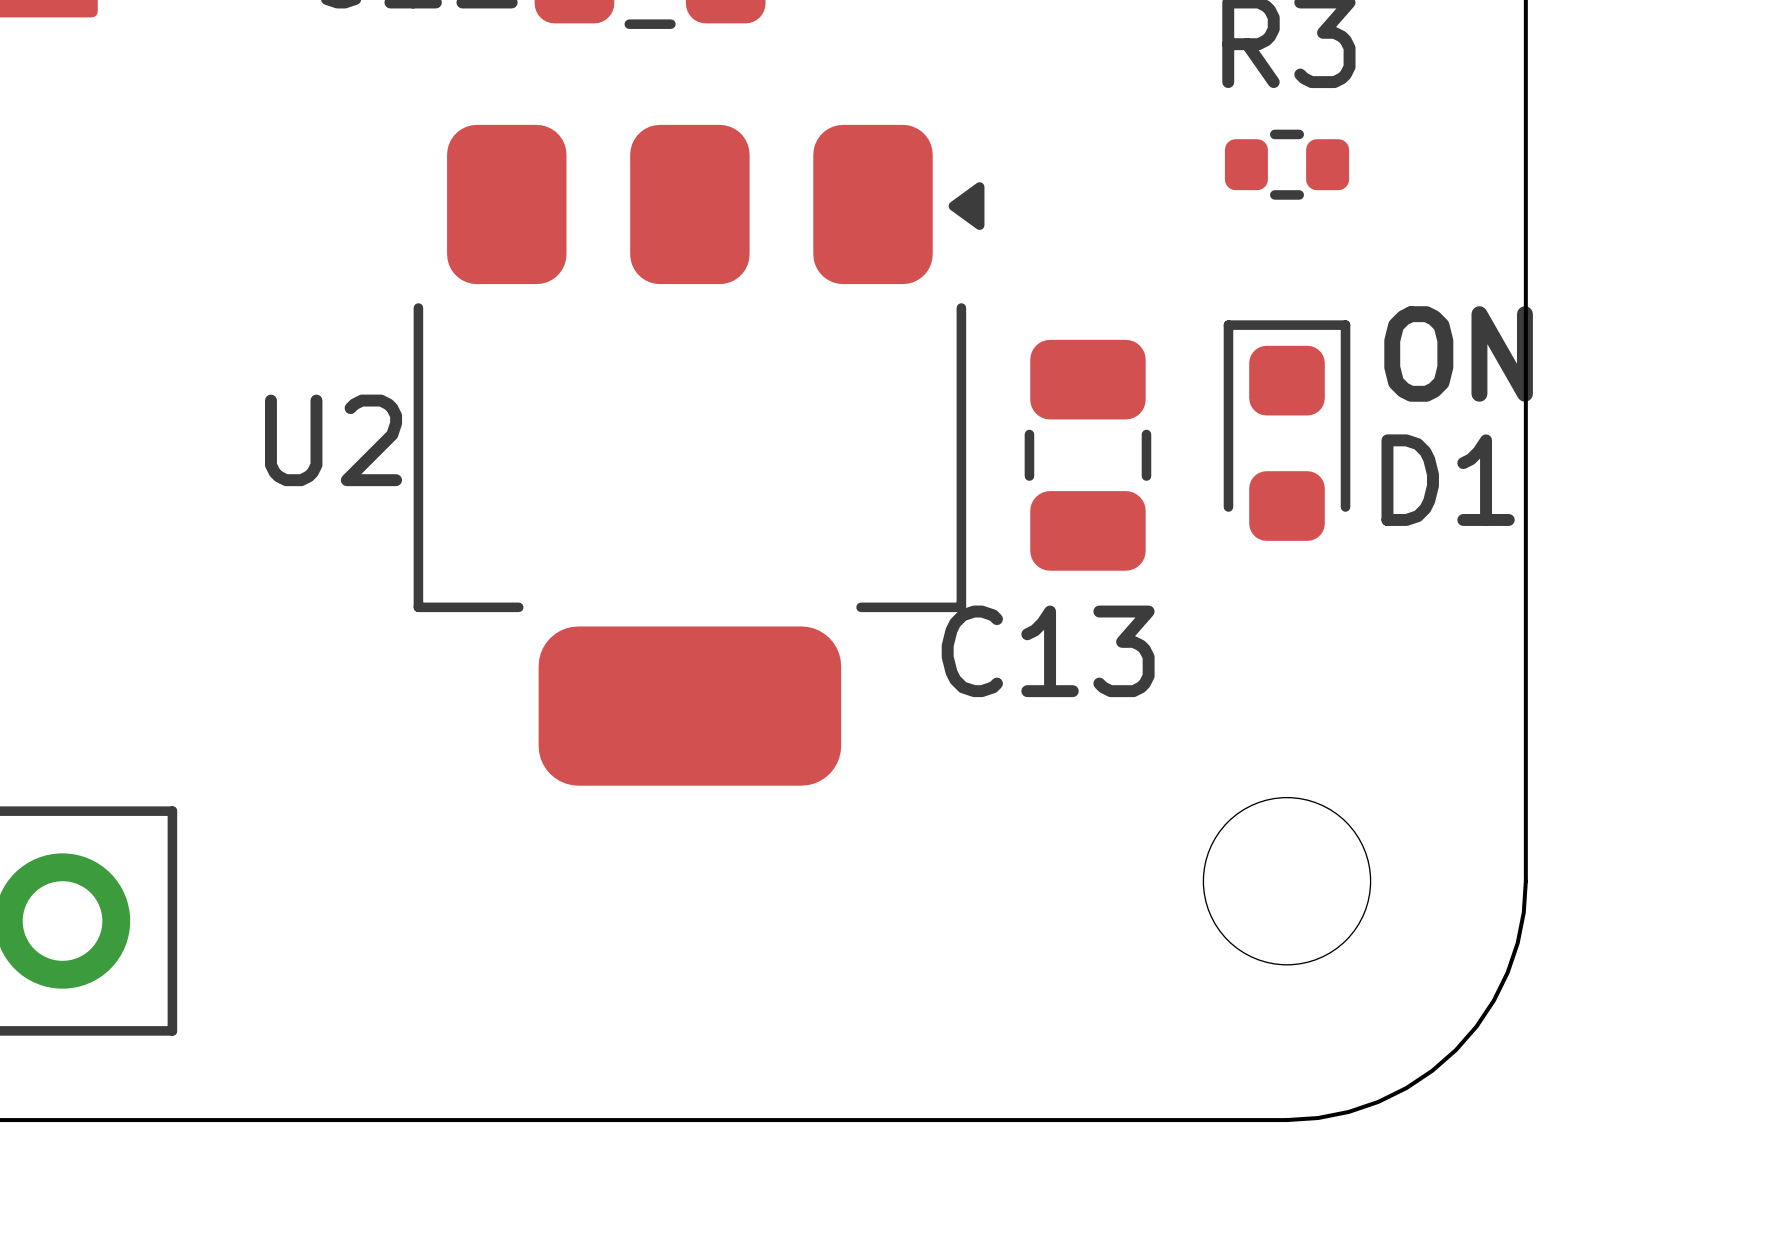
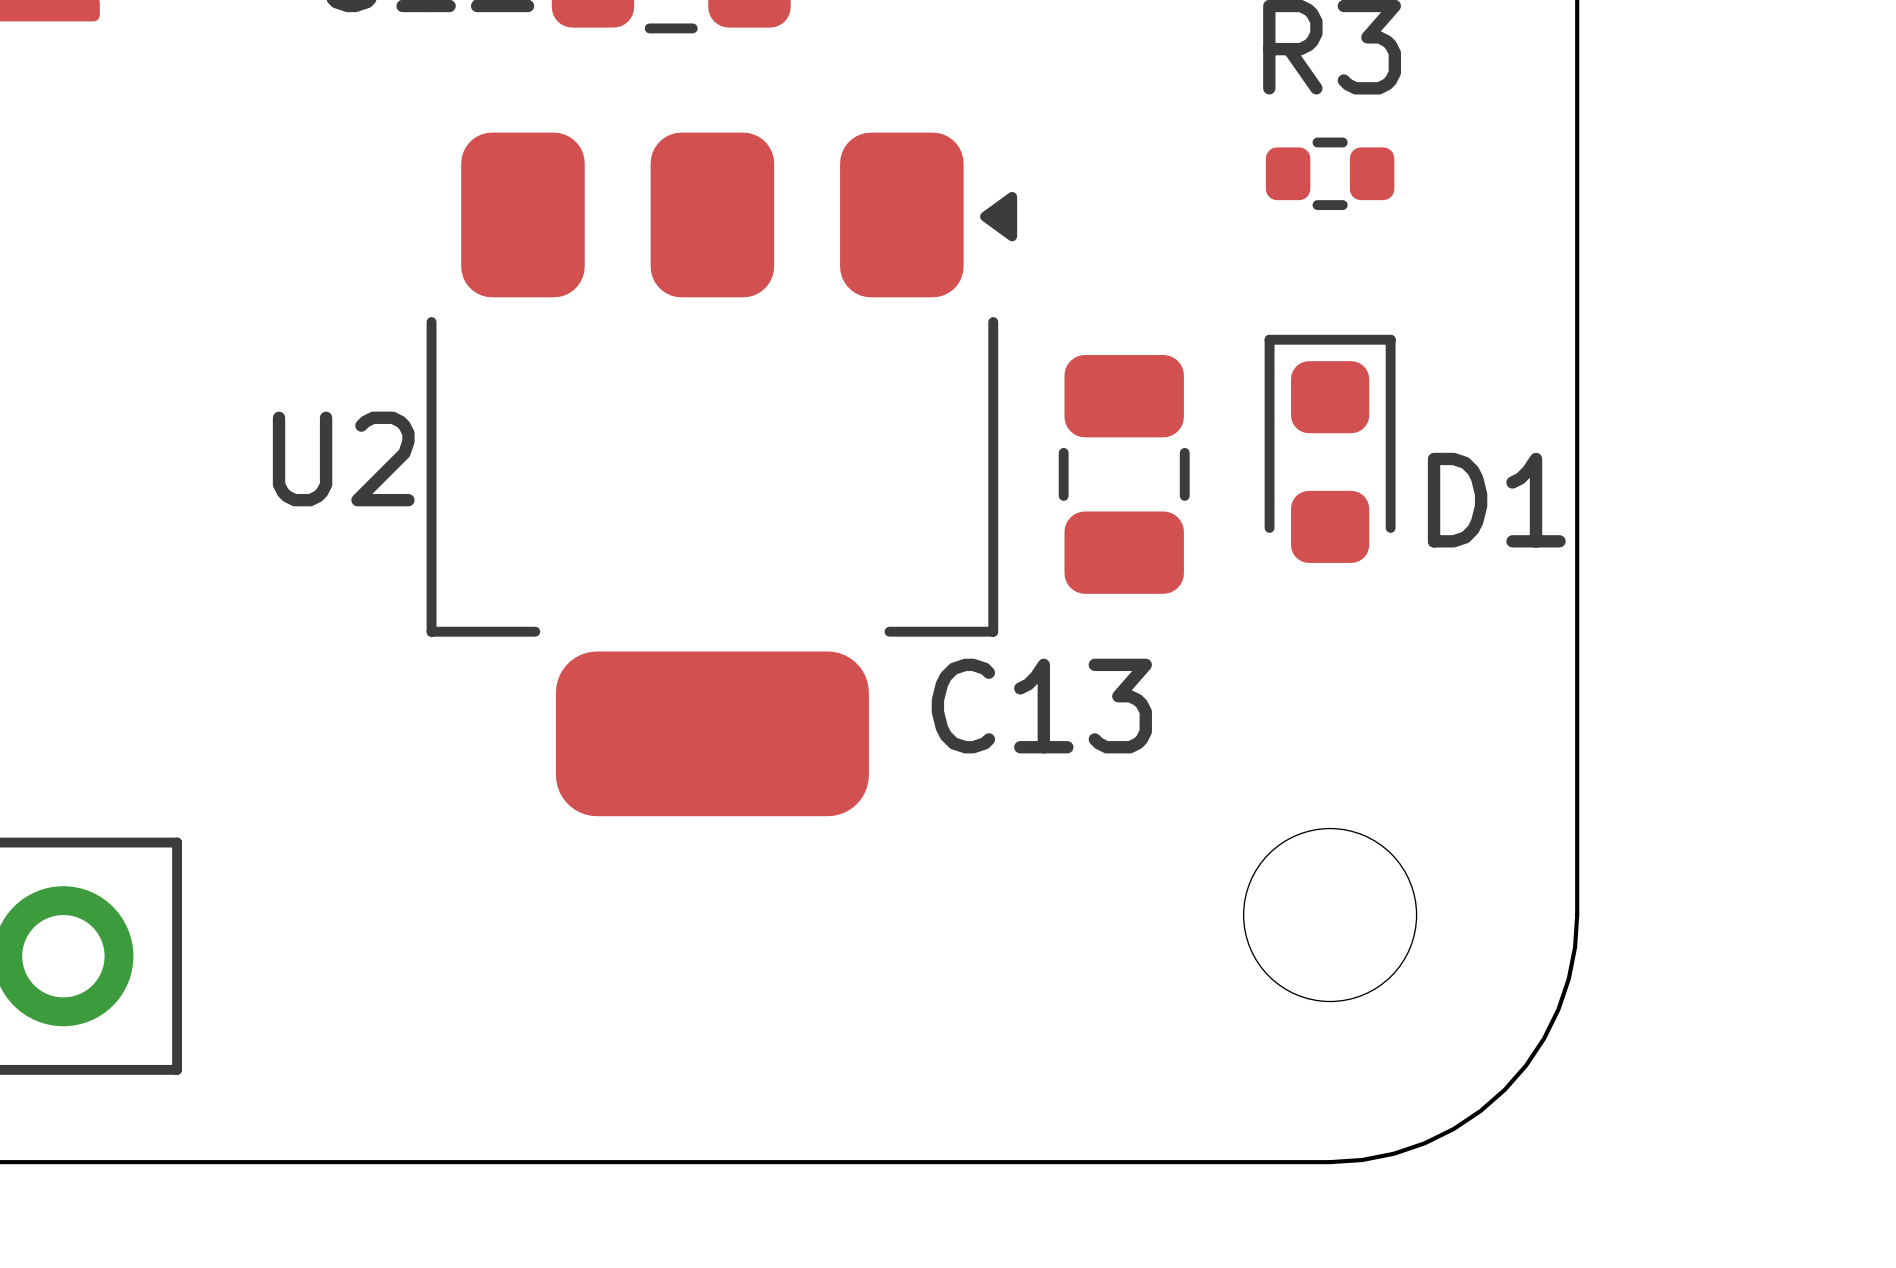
text: ON (1458, 353) -> none
C13 name position: C13 (1048, 651) -> C13 (1041, 706)

